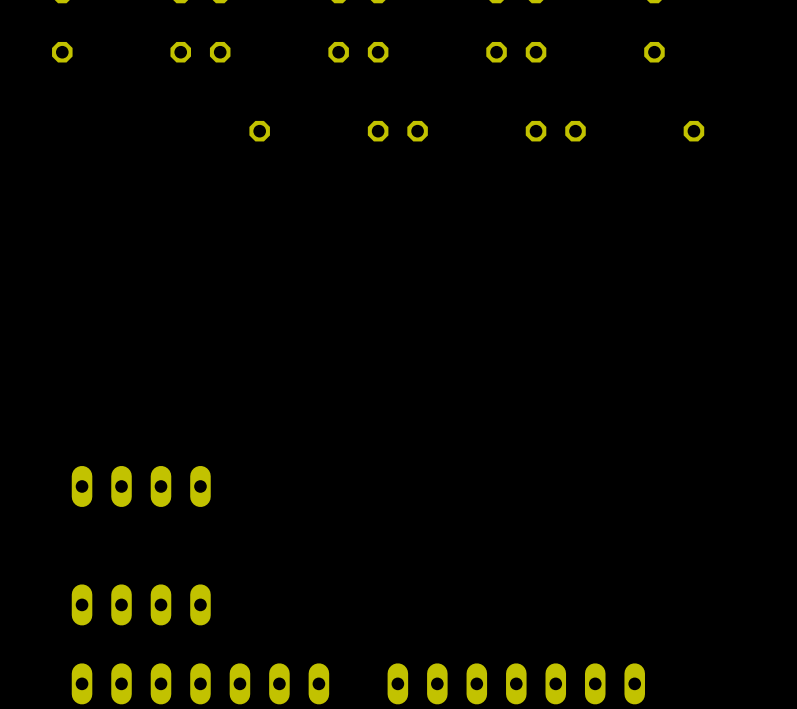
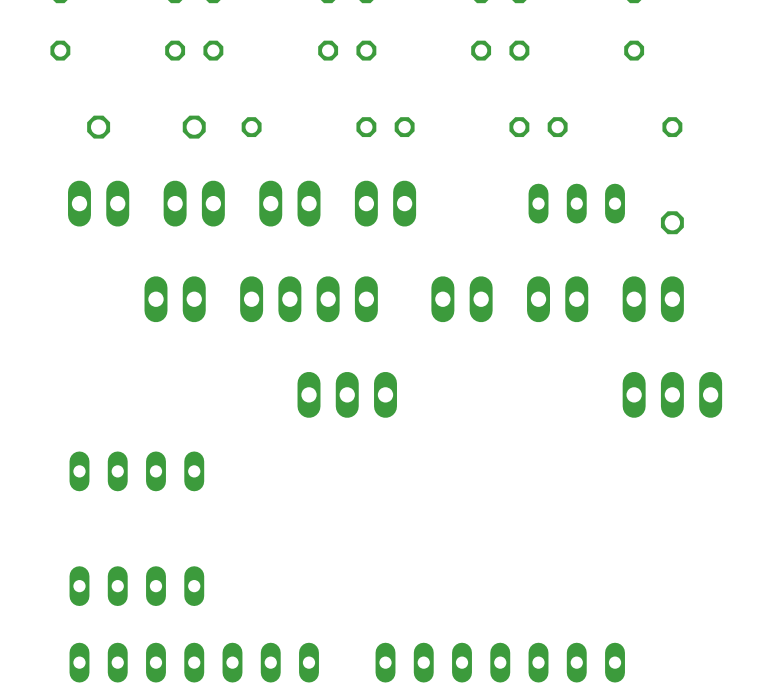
part: none -> (98, 127)
part: none -> (194, 127)
part: none -> (98, 203)
part: none -> (194, 203)
part: none -> (289, 203)
part: none -> (385, 203)
part: none -> (576, 203)
part: none -> (672, 222)
part: none -> (175, 299)
part: none -> (309, 299)
part: none -> (462, 299)
part: none -> (557, 299)
part: none -> (653, 299)
part: none -> (347, 394)
part: none -> (672, 394)

